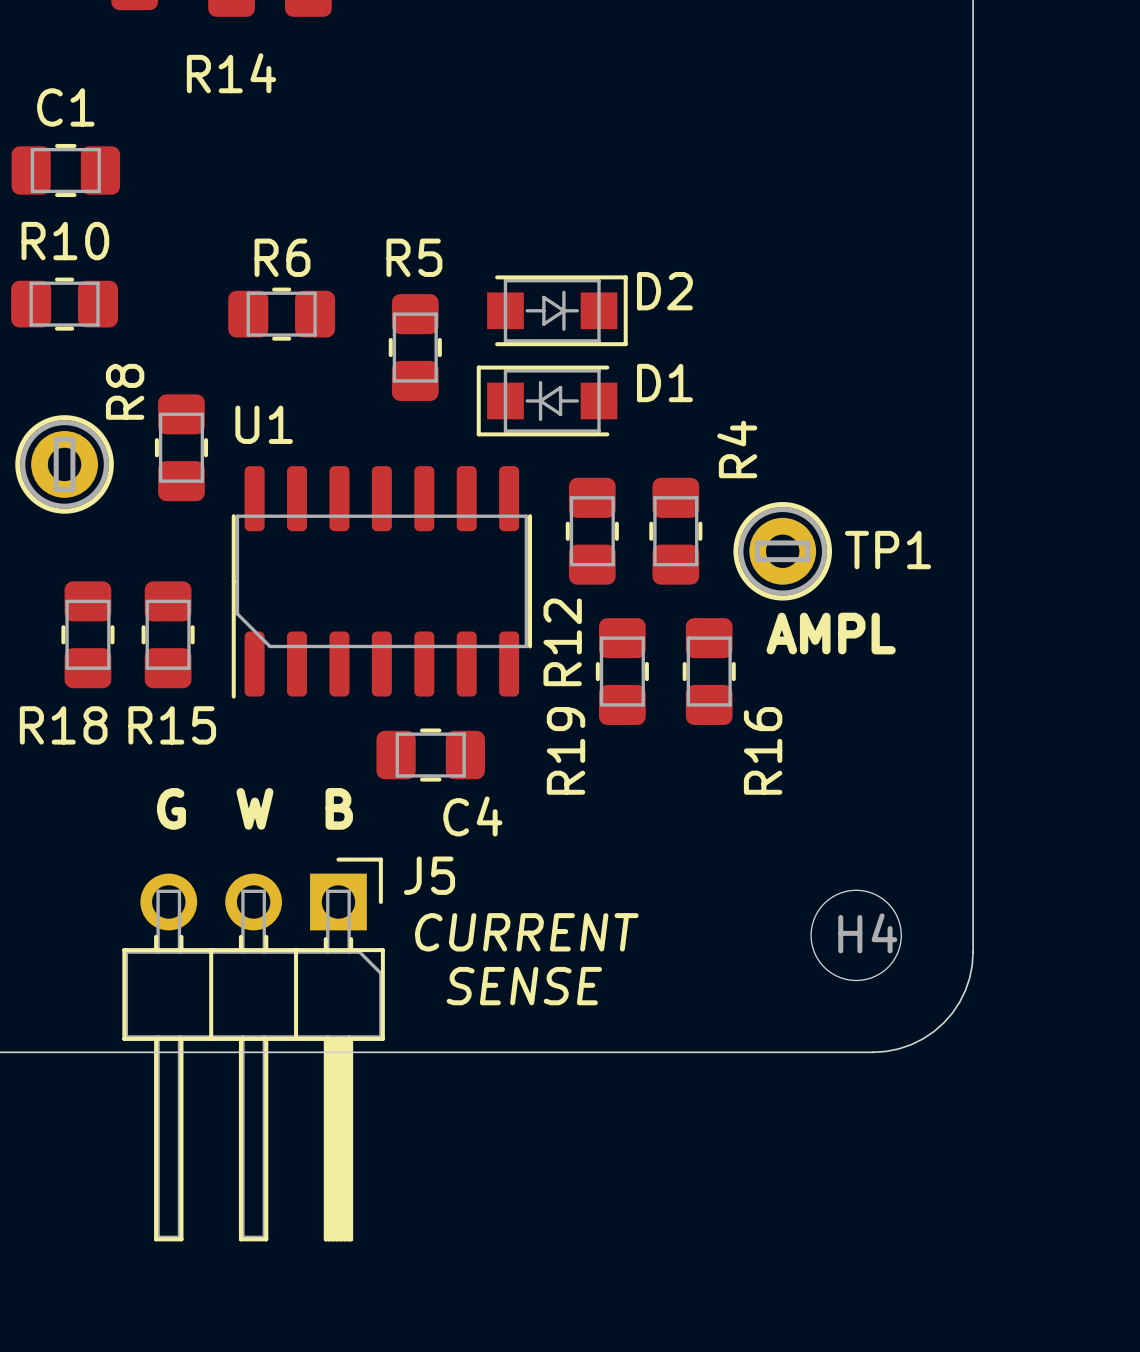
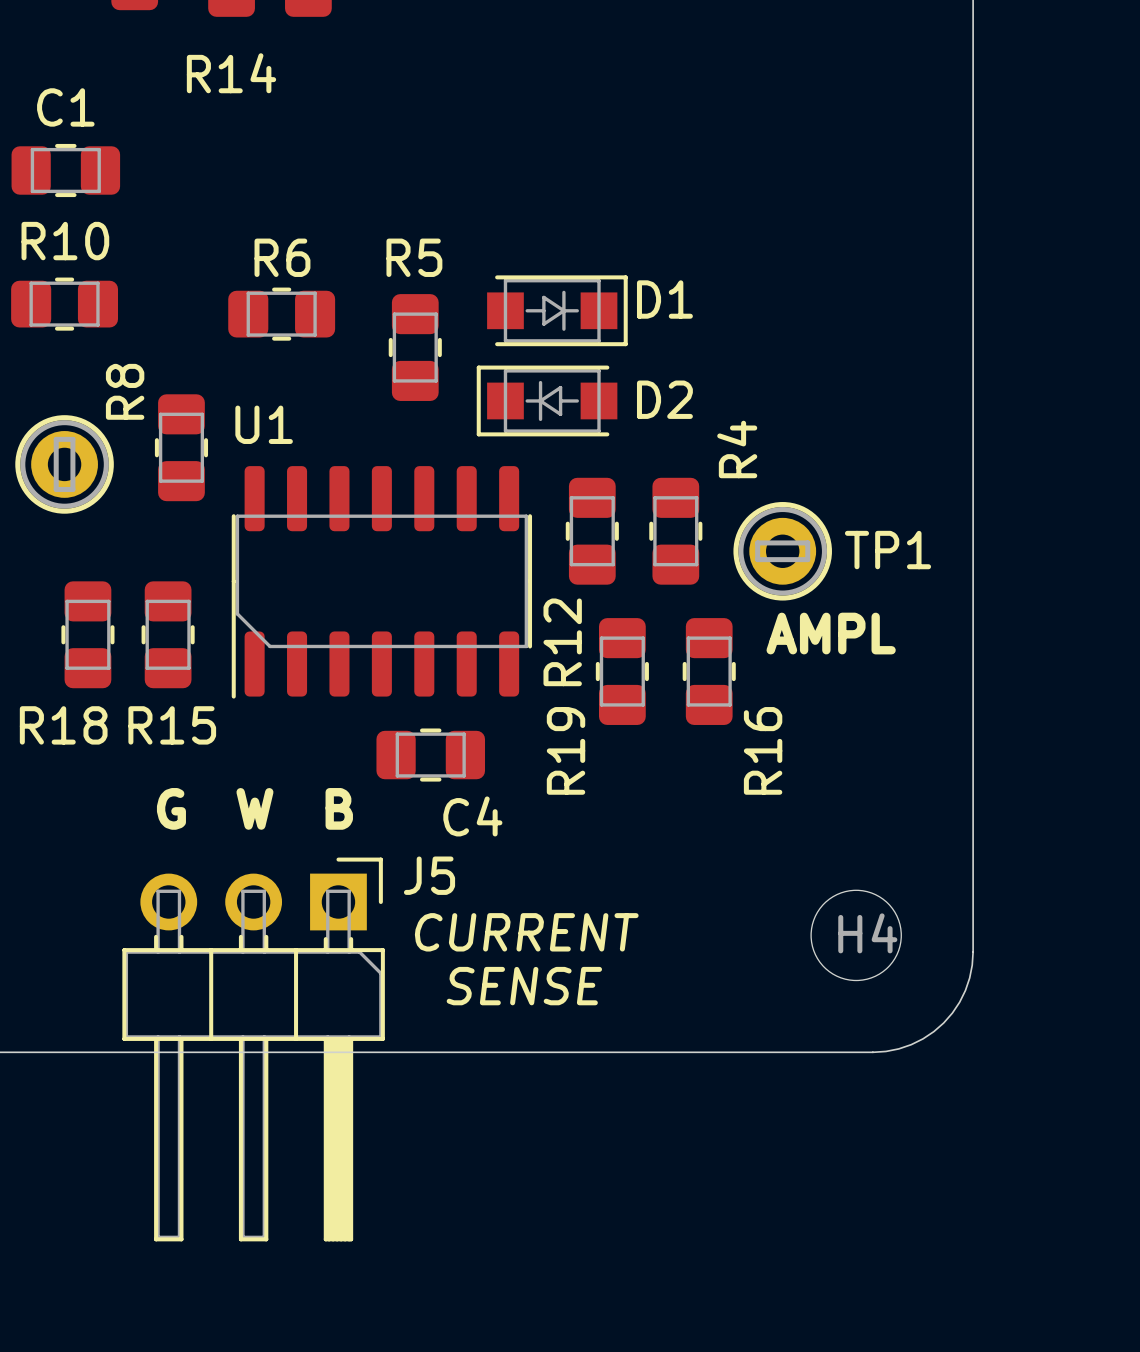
D2 name position: D2 (664, 291) -> D2 (664, 399)
D1 name position: D1 (664, 383) -> D1 (664, 299)

